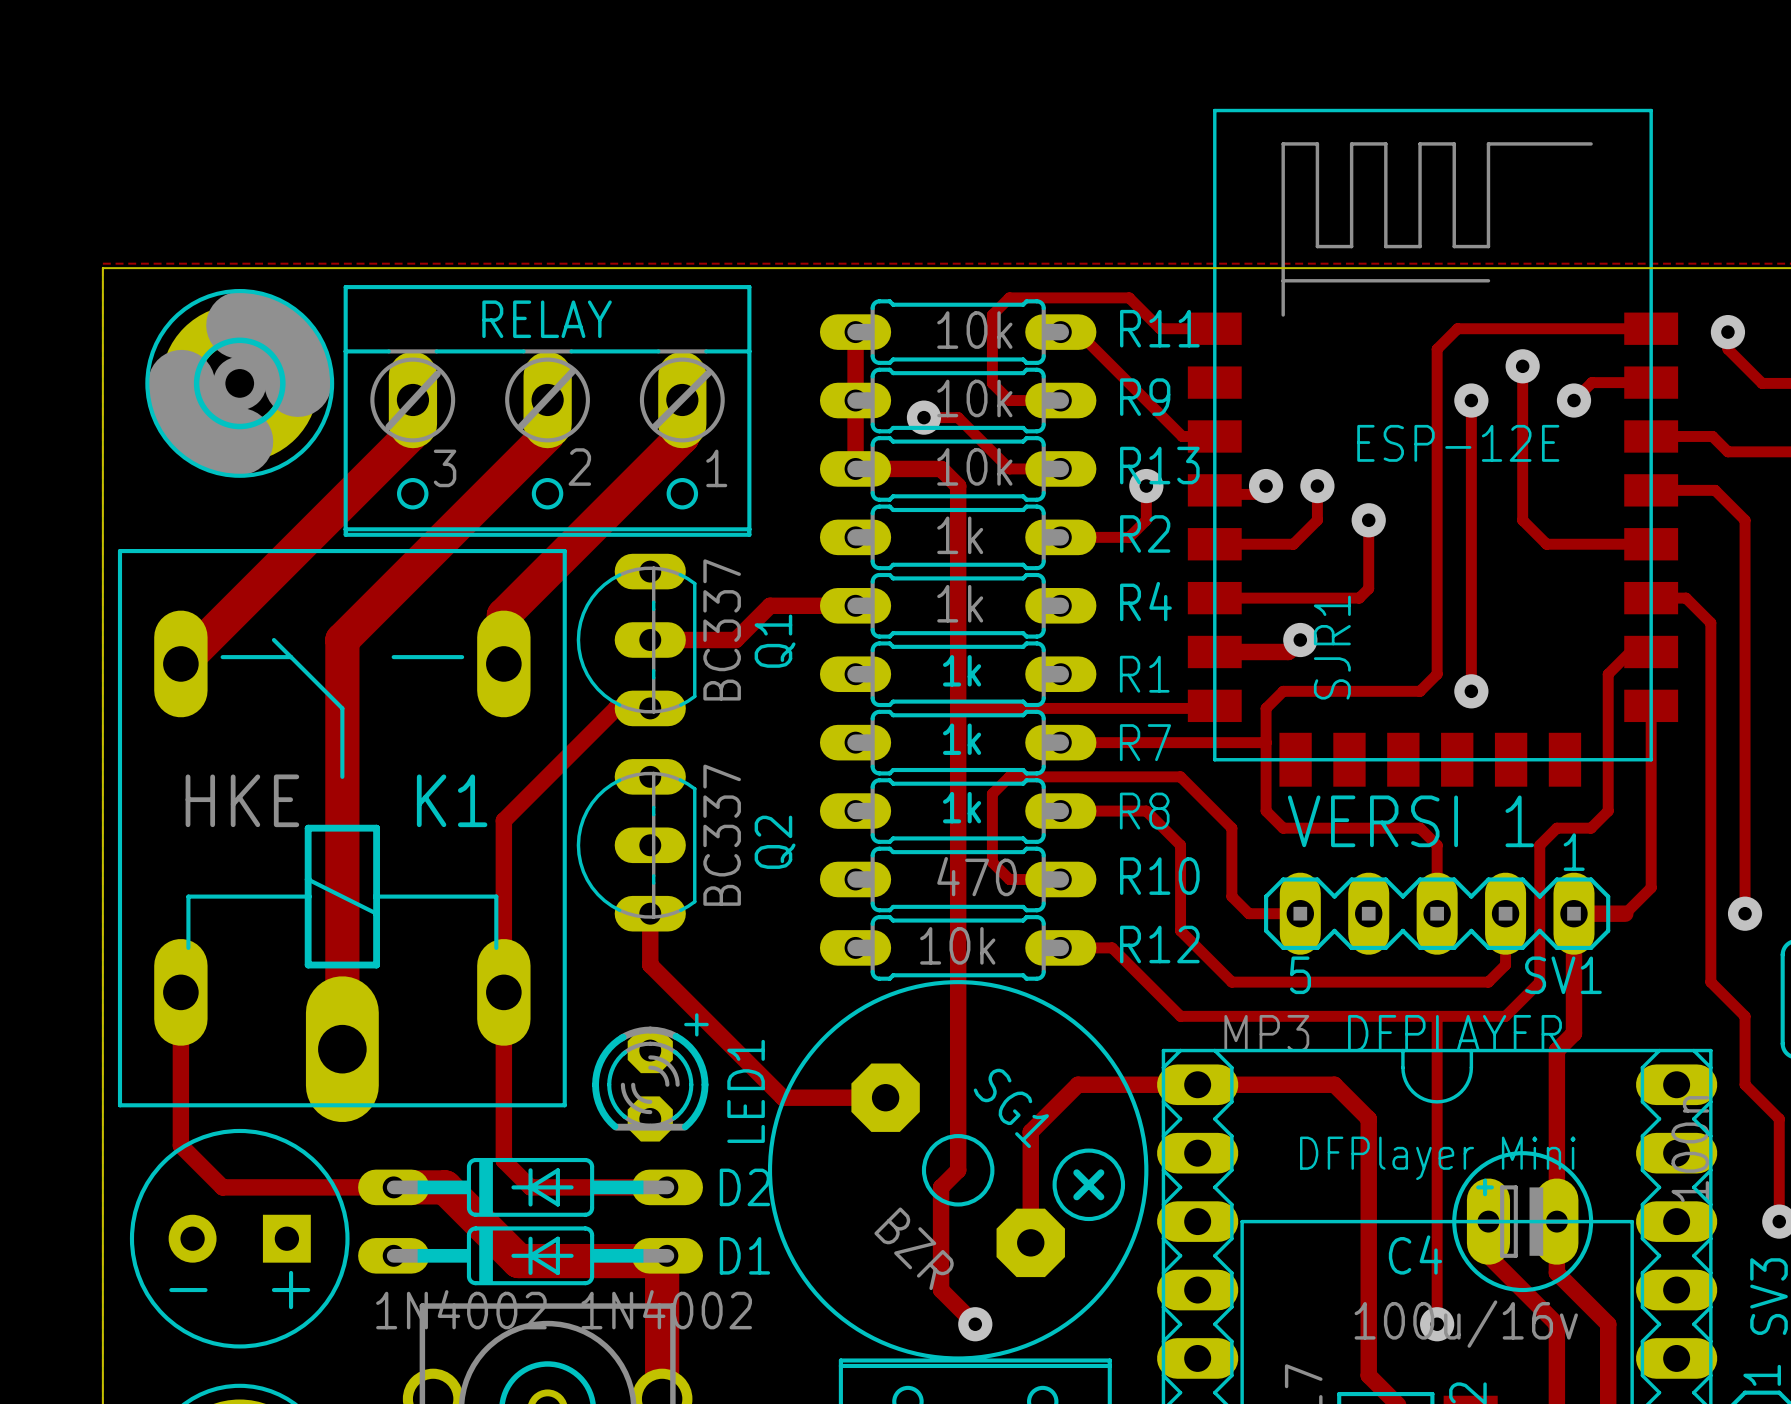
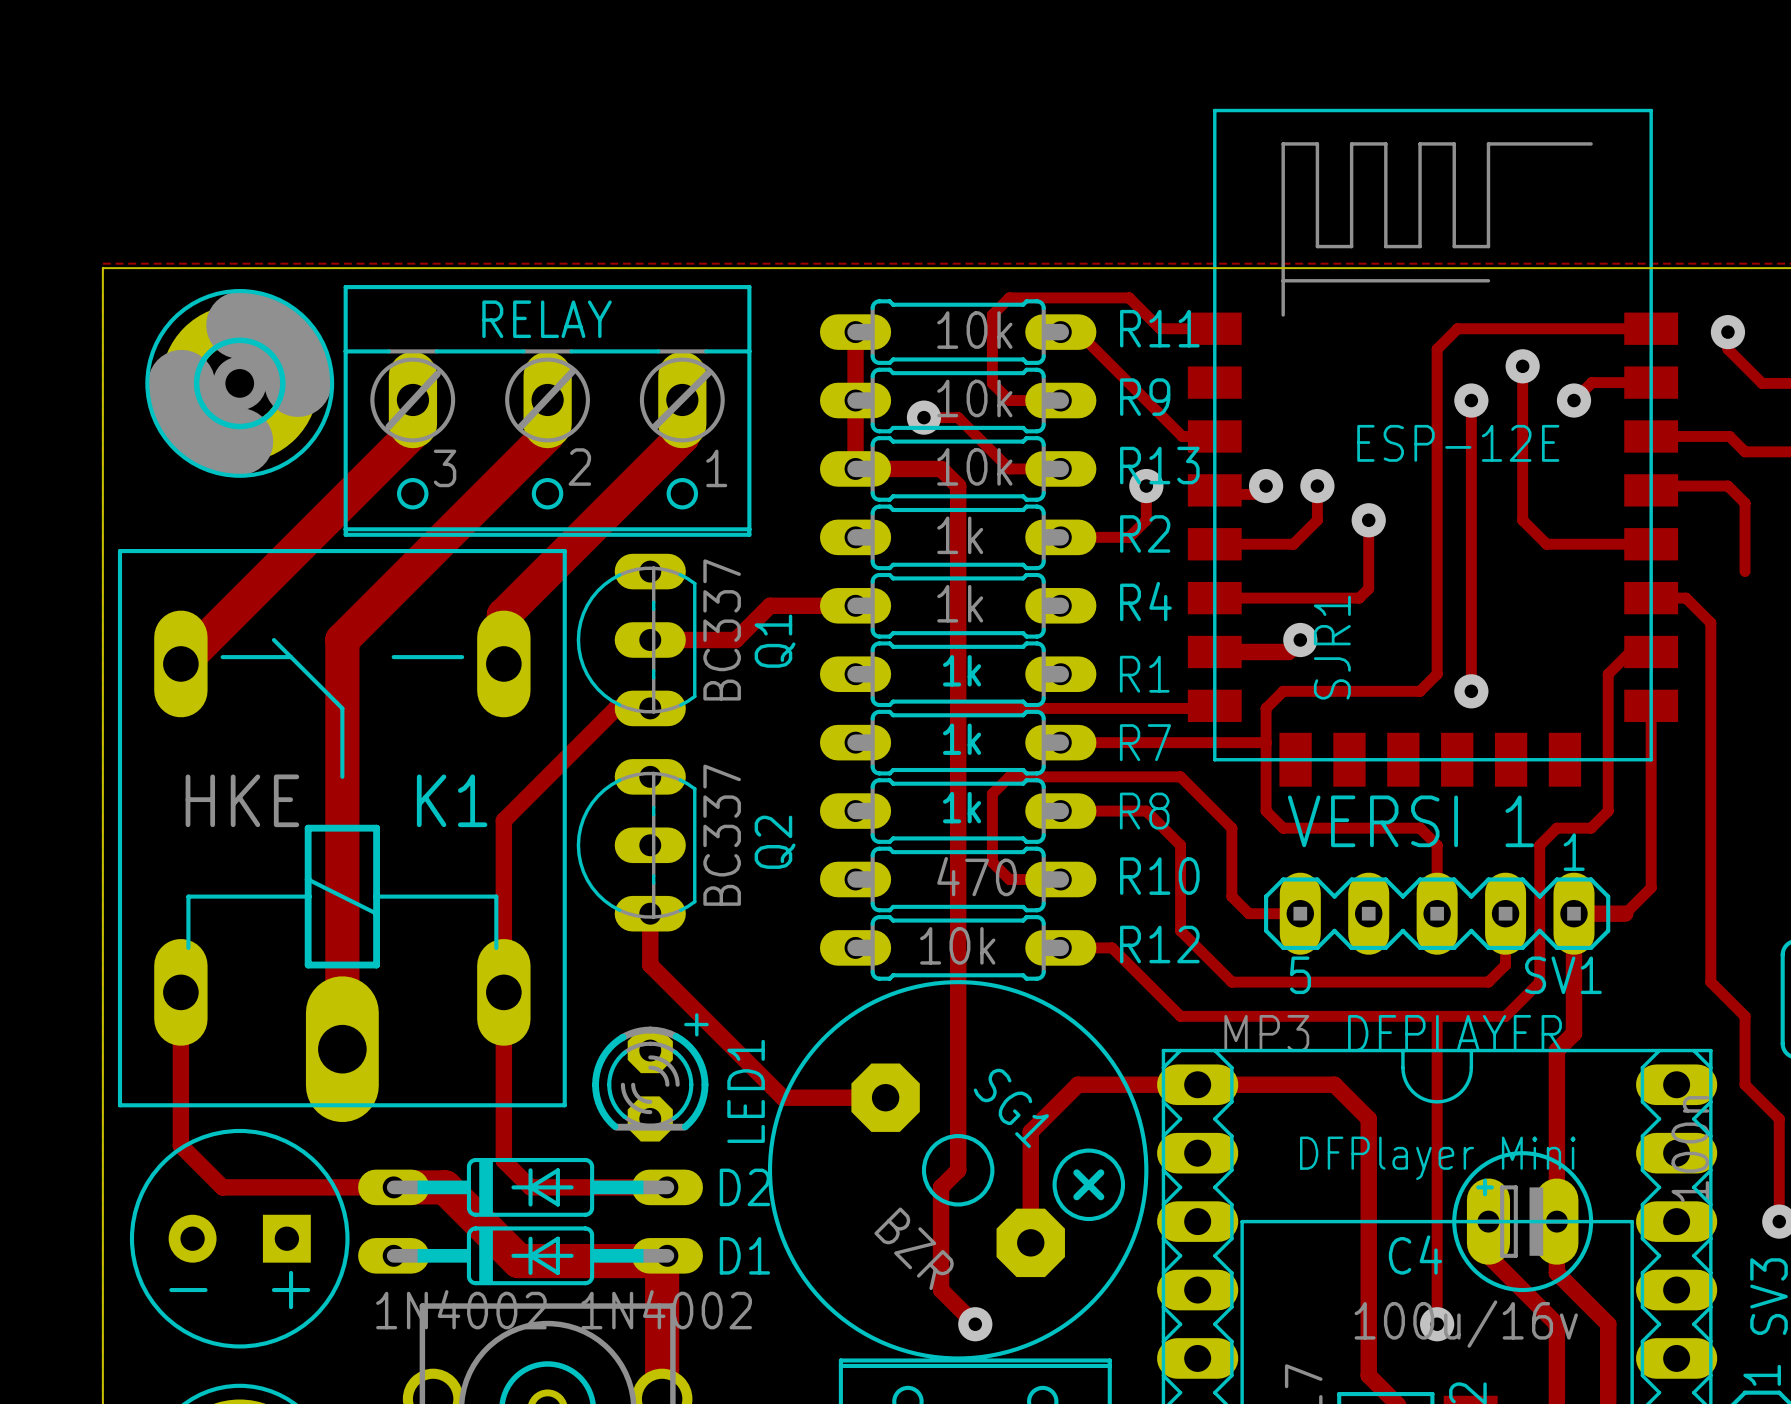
track: (1712, 436) (1727, 451) (1745, 451) -> (1712, 436) (1729, 436) (1745, 451)
track: (1651, 490) (1715, 490) (1745, 520) -> (1651, 490) (1655, 486) (1727, 486) (1745, 503) (1745, 520)
track: (1745, 571) (1745, 913) -> none
via: (1745, 913) -> none

